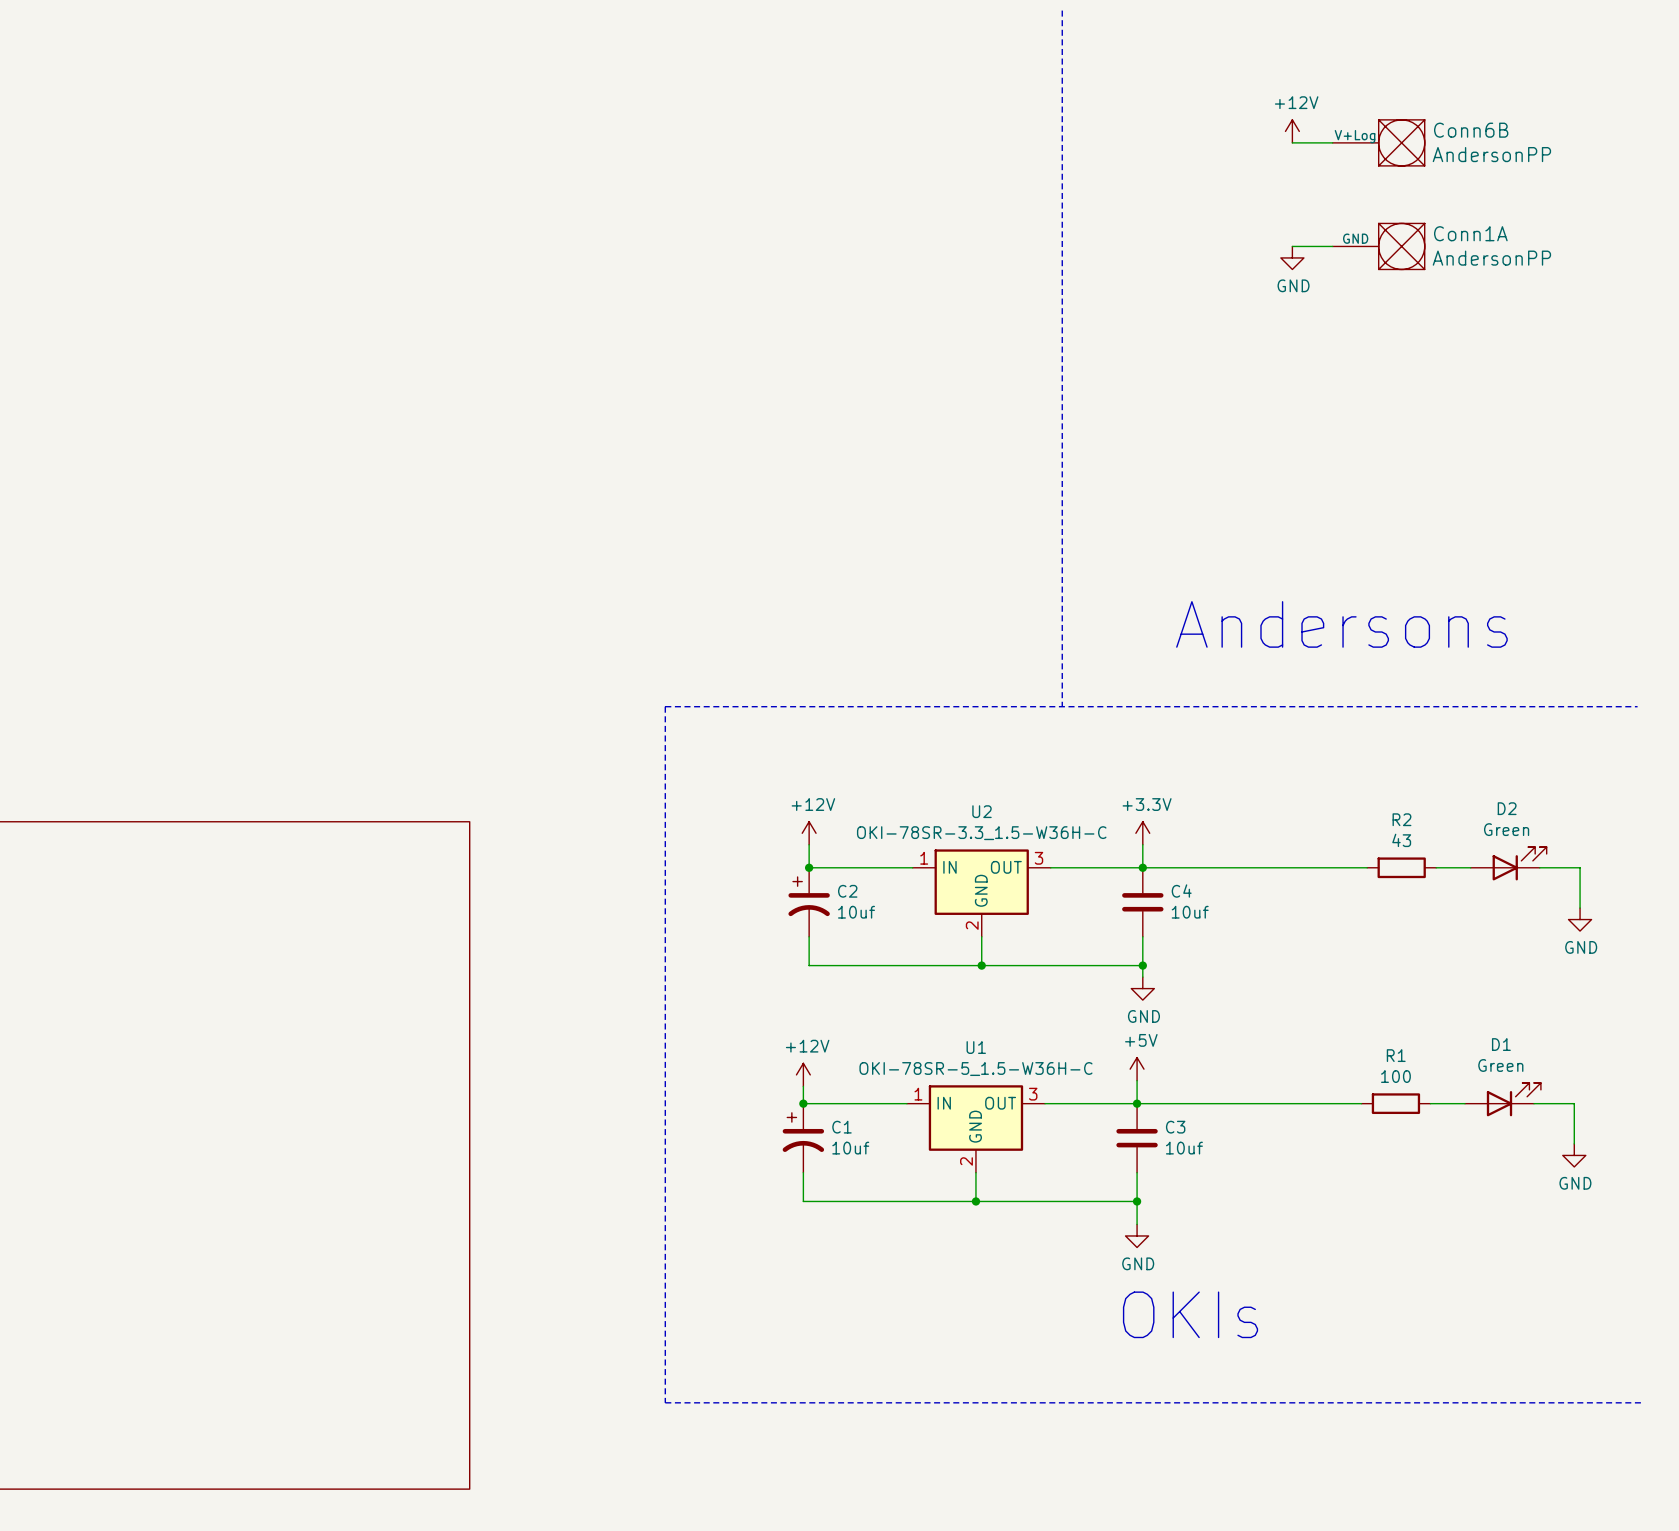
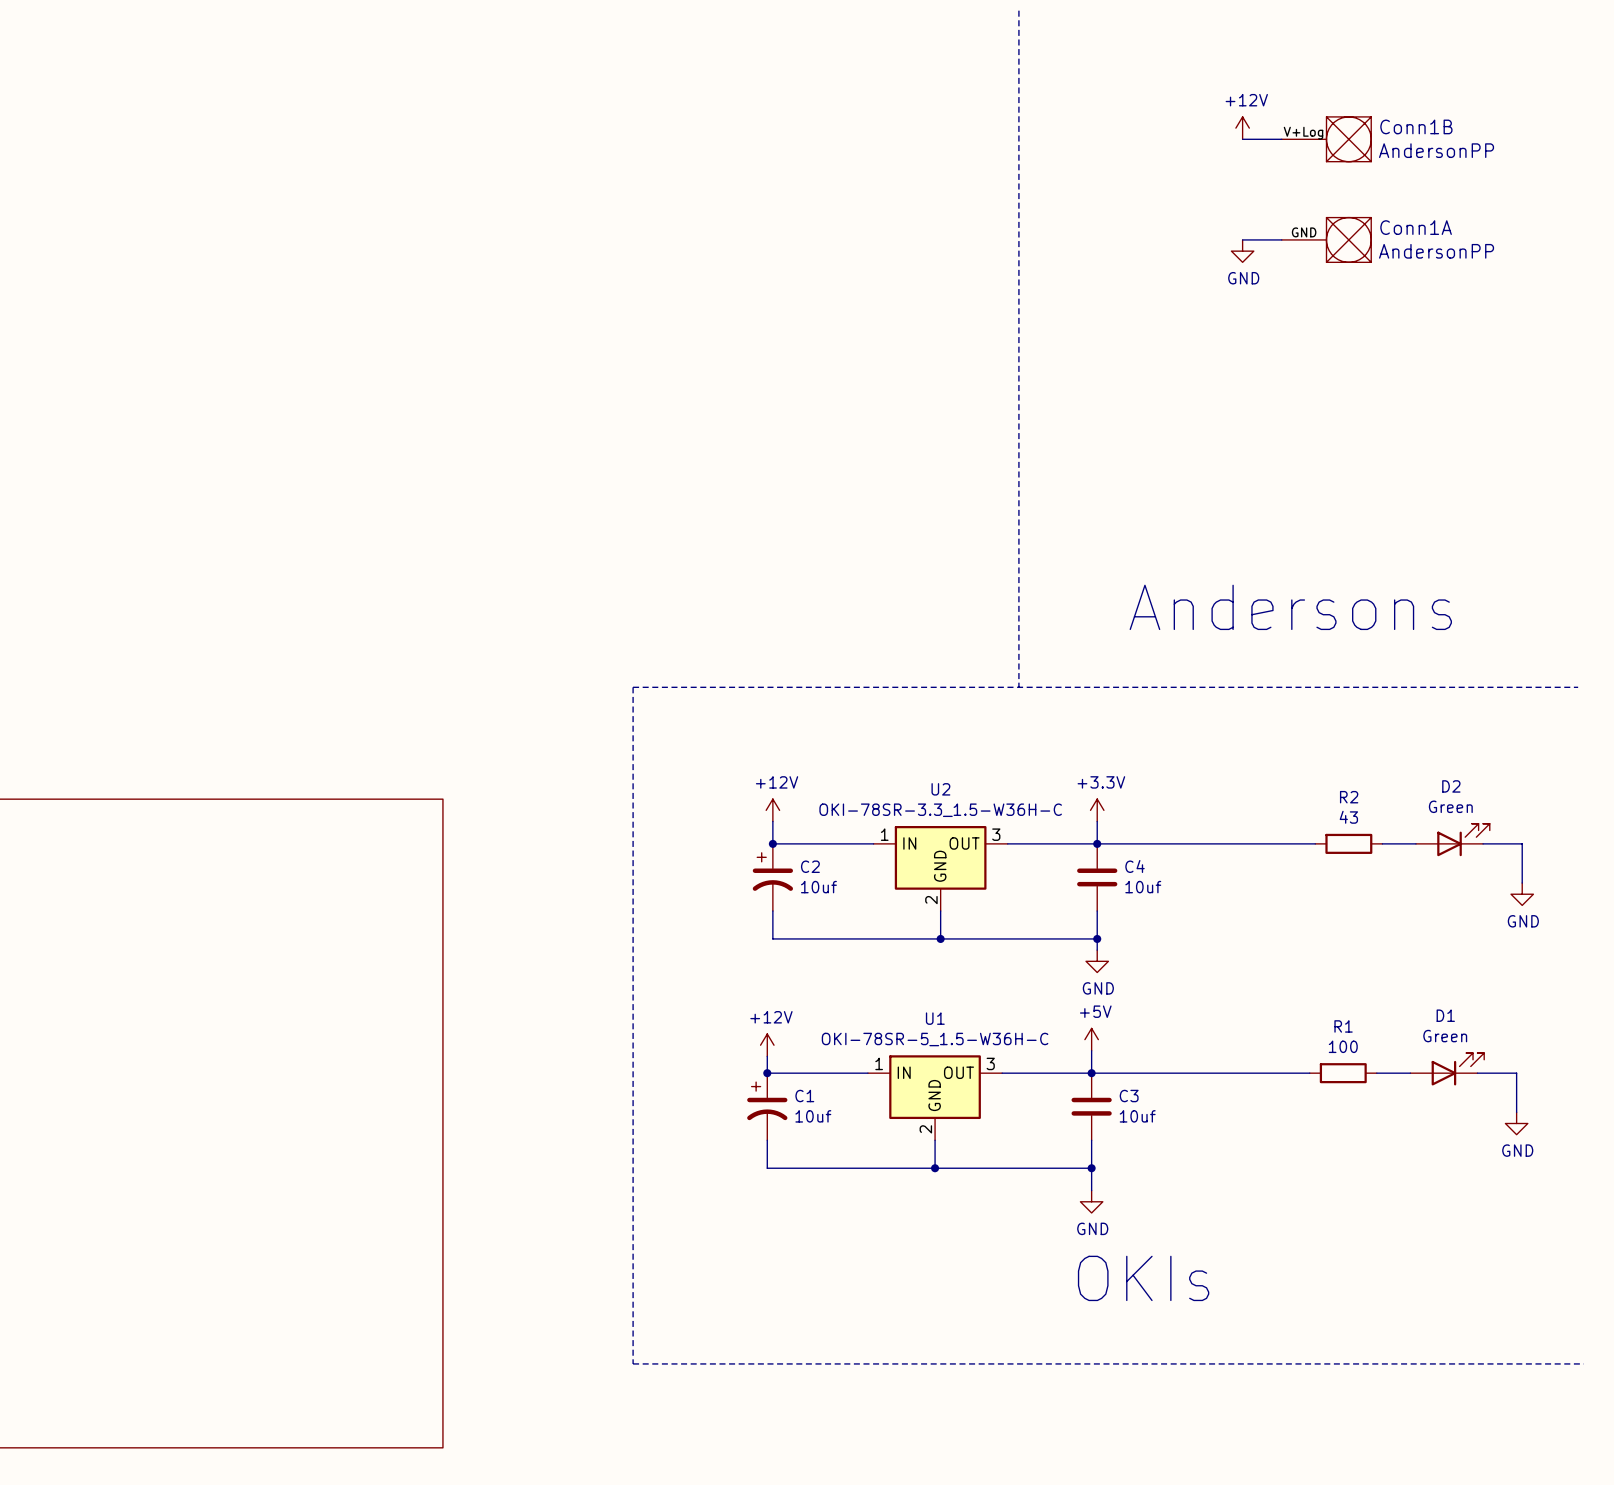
Conn6B name: Conn6B (1471, 130) -> Conn1B (1416, 126)

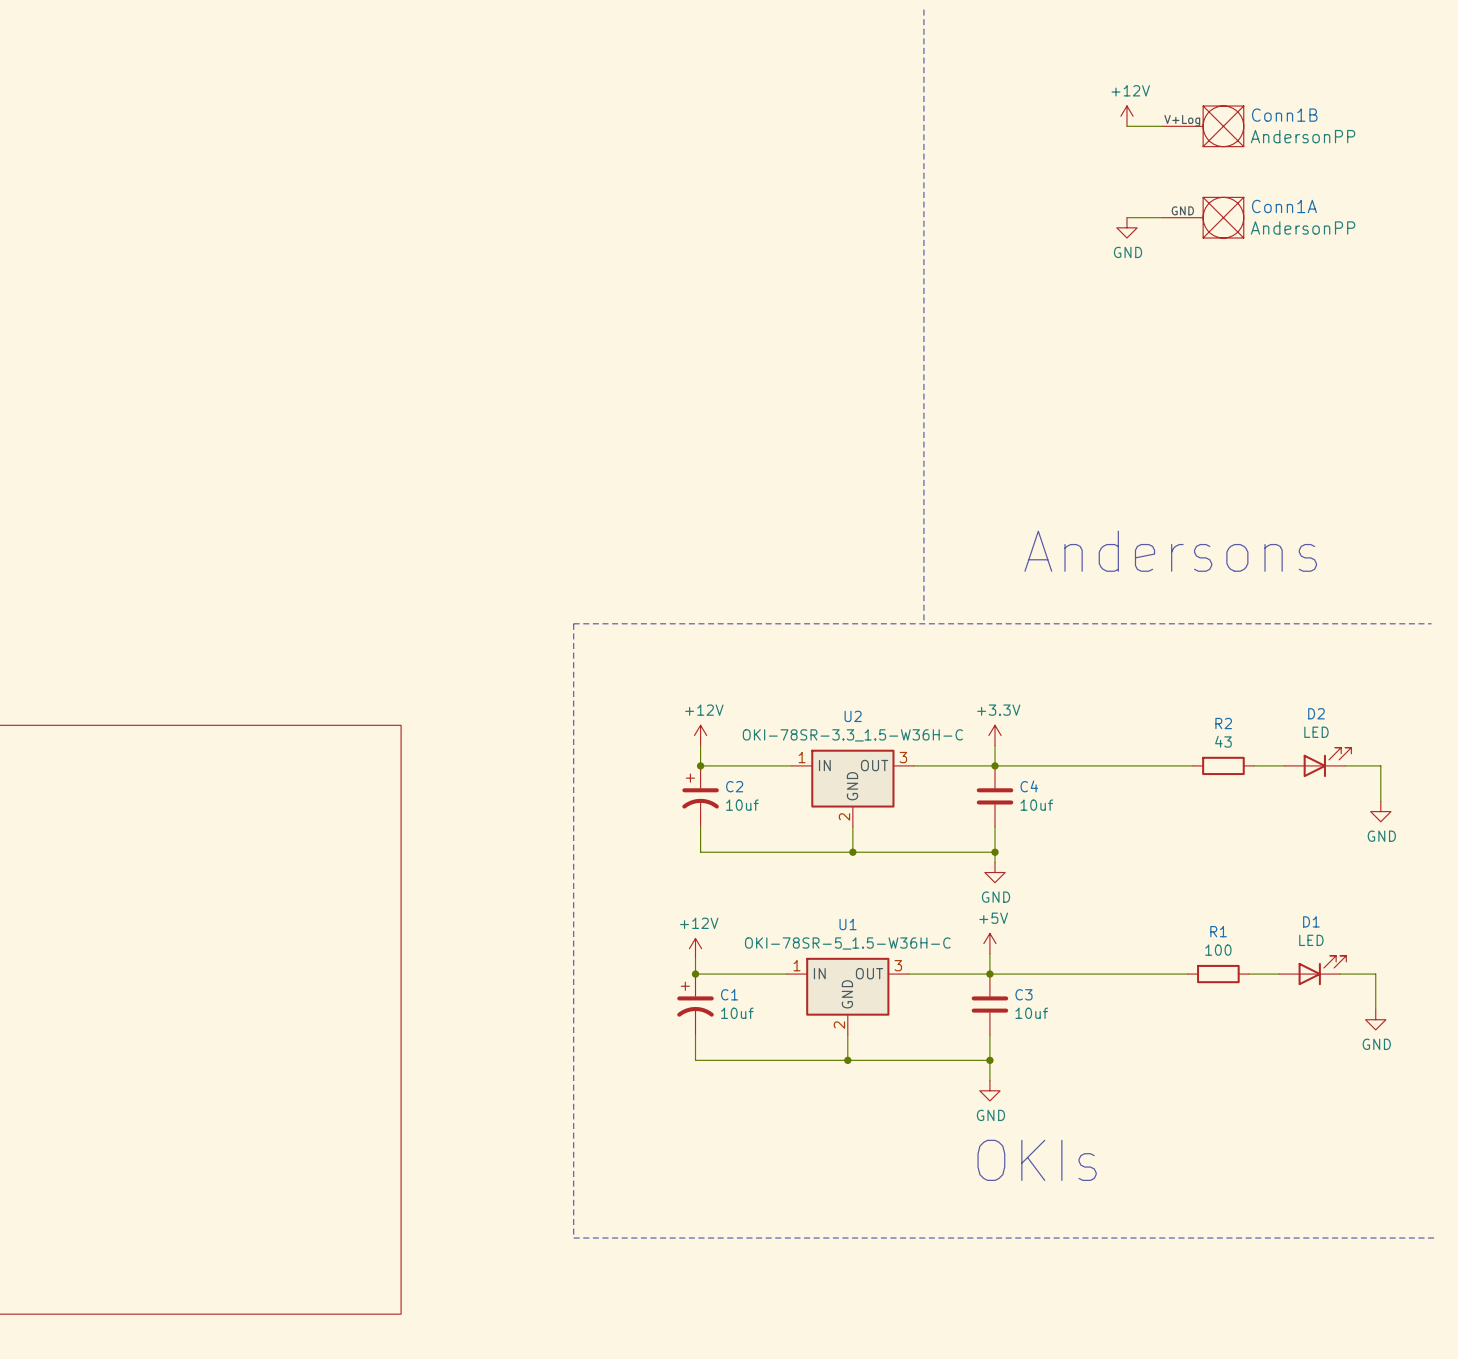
D2 value: Green (1450, 806) -> LED (1316, 732)
D1 value: Green (1445, 1036) -> LED (1311, 940)

